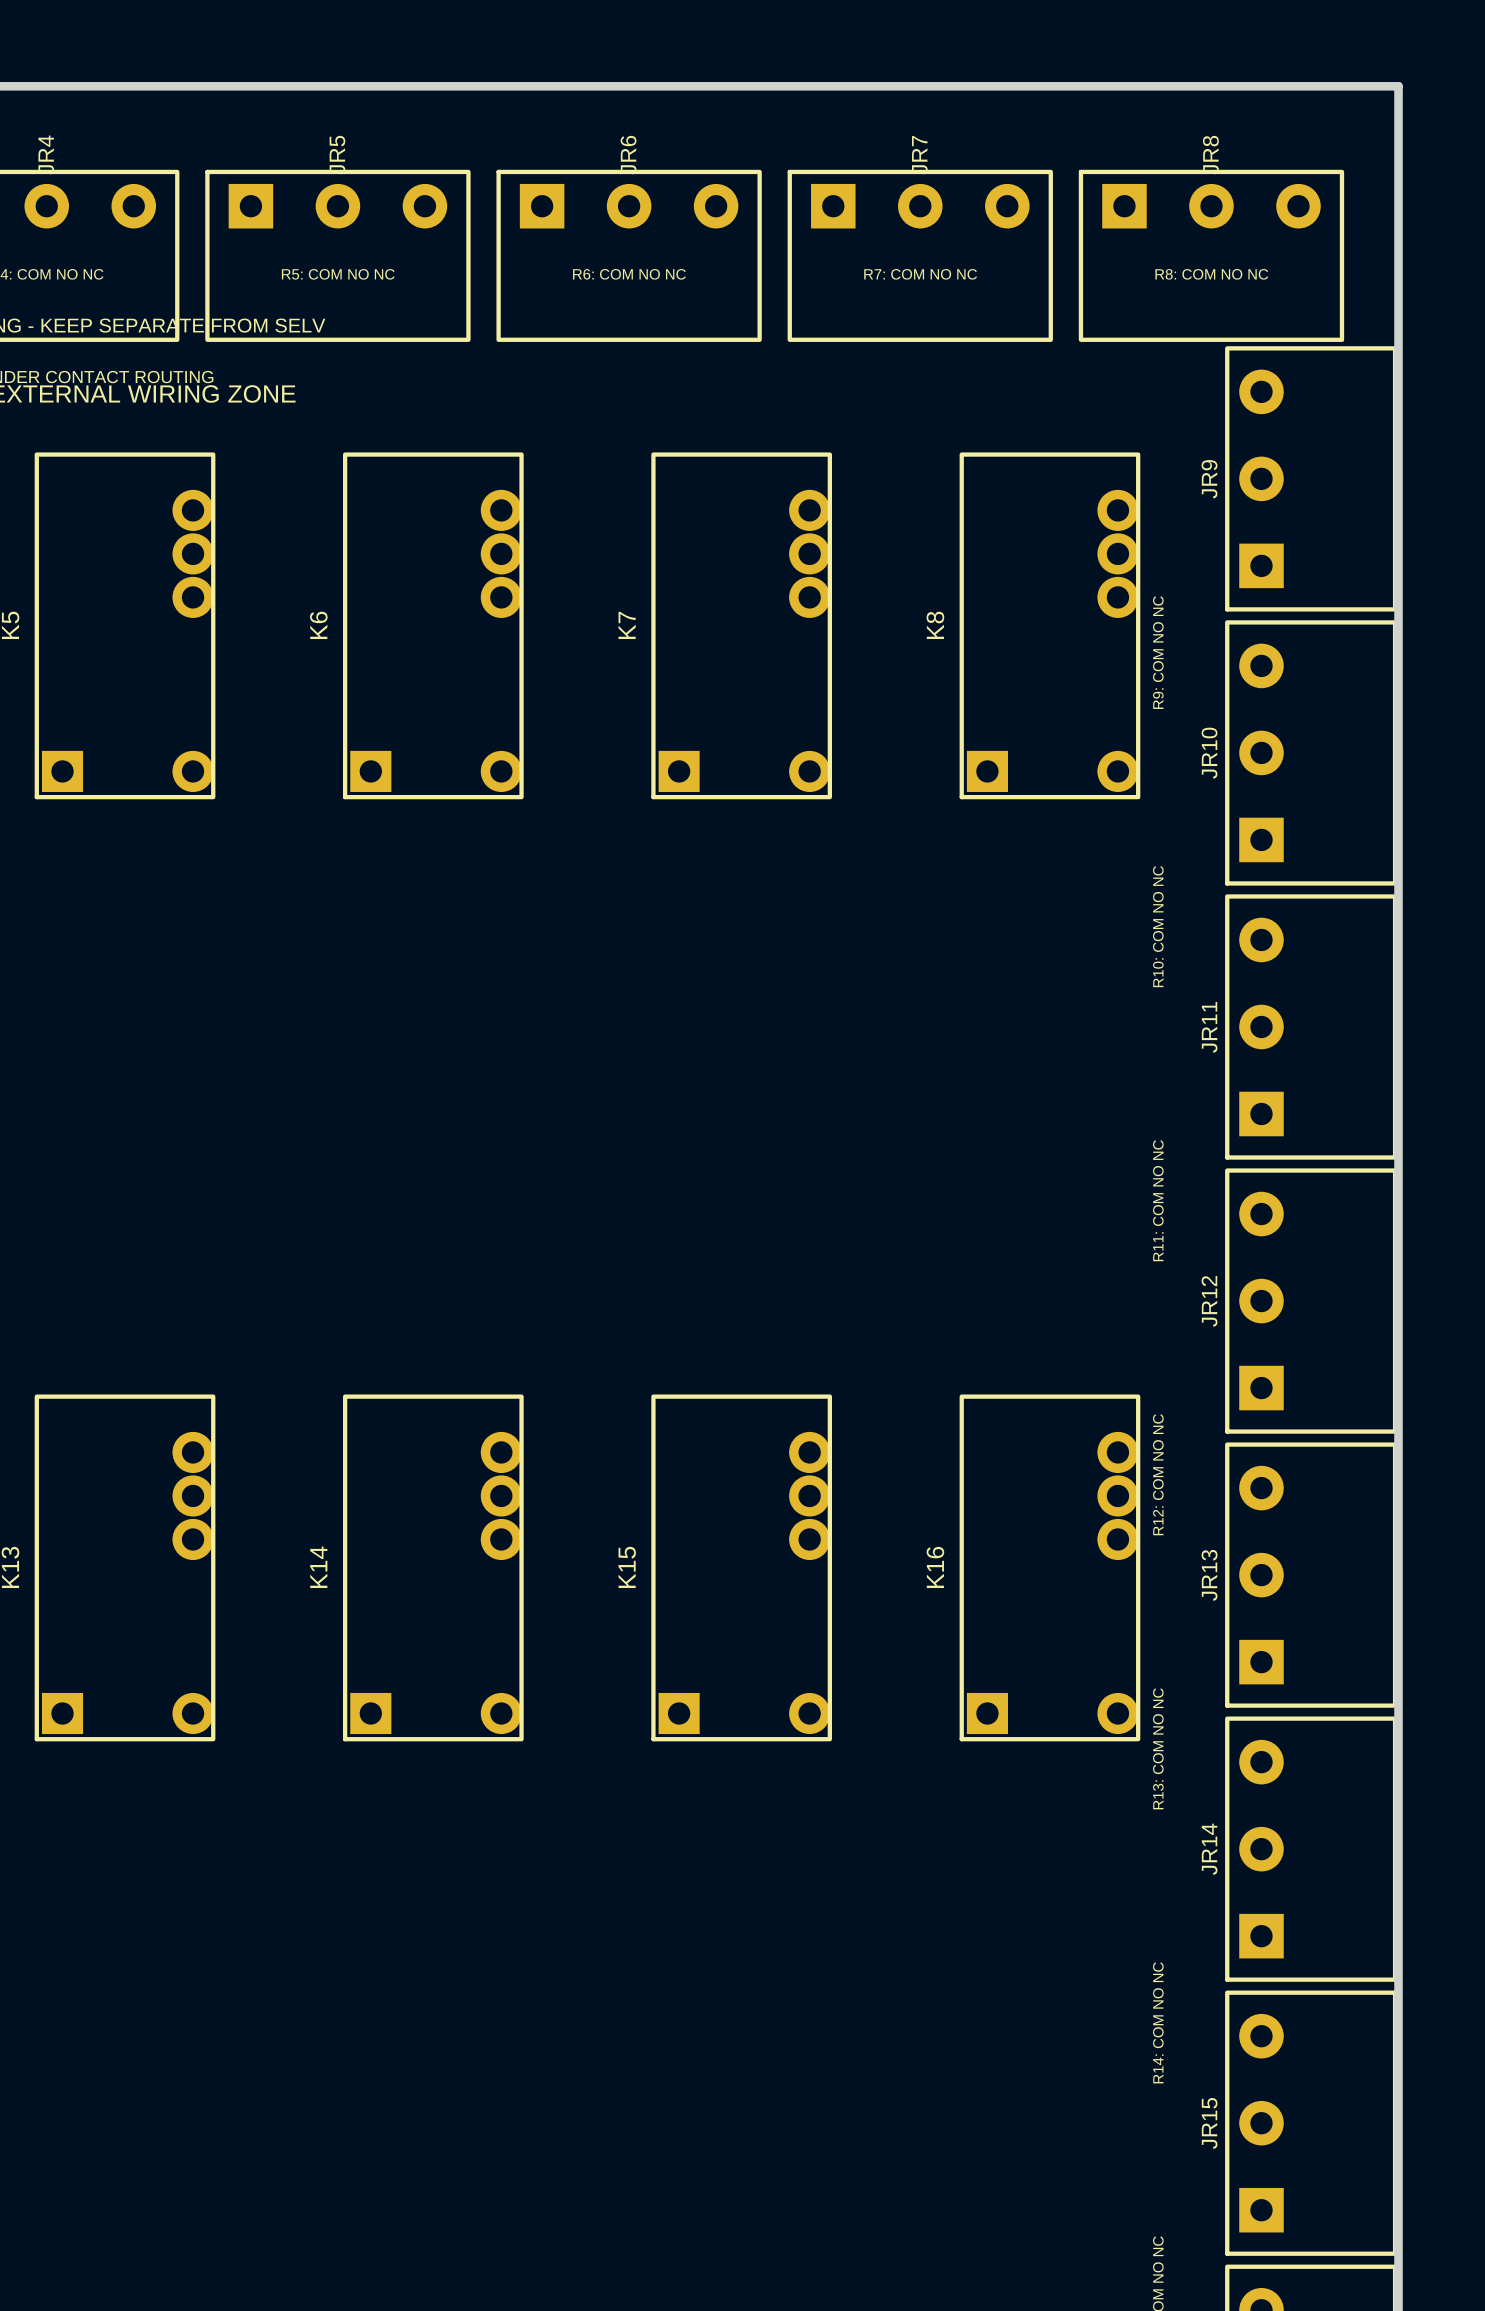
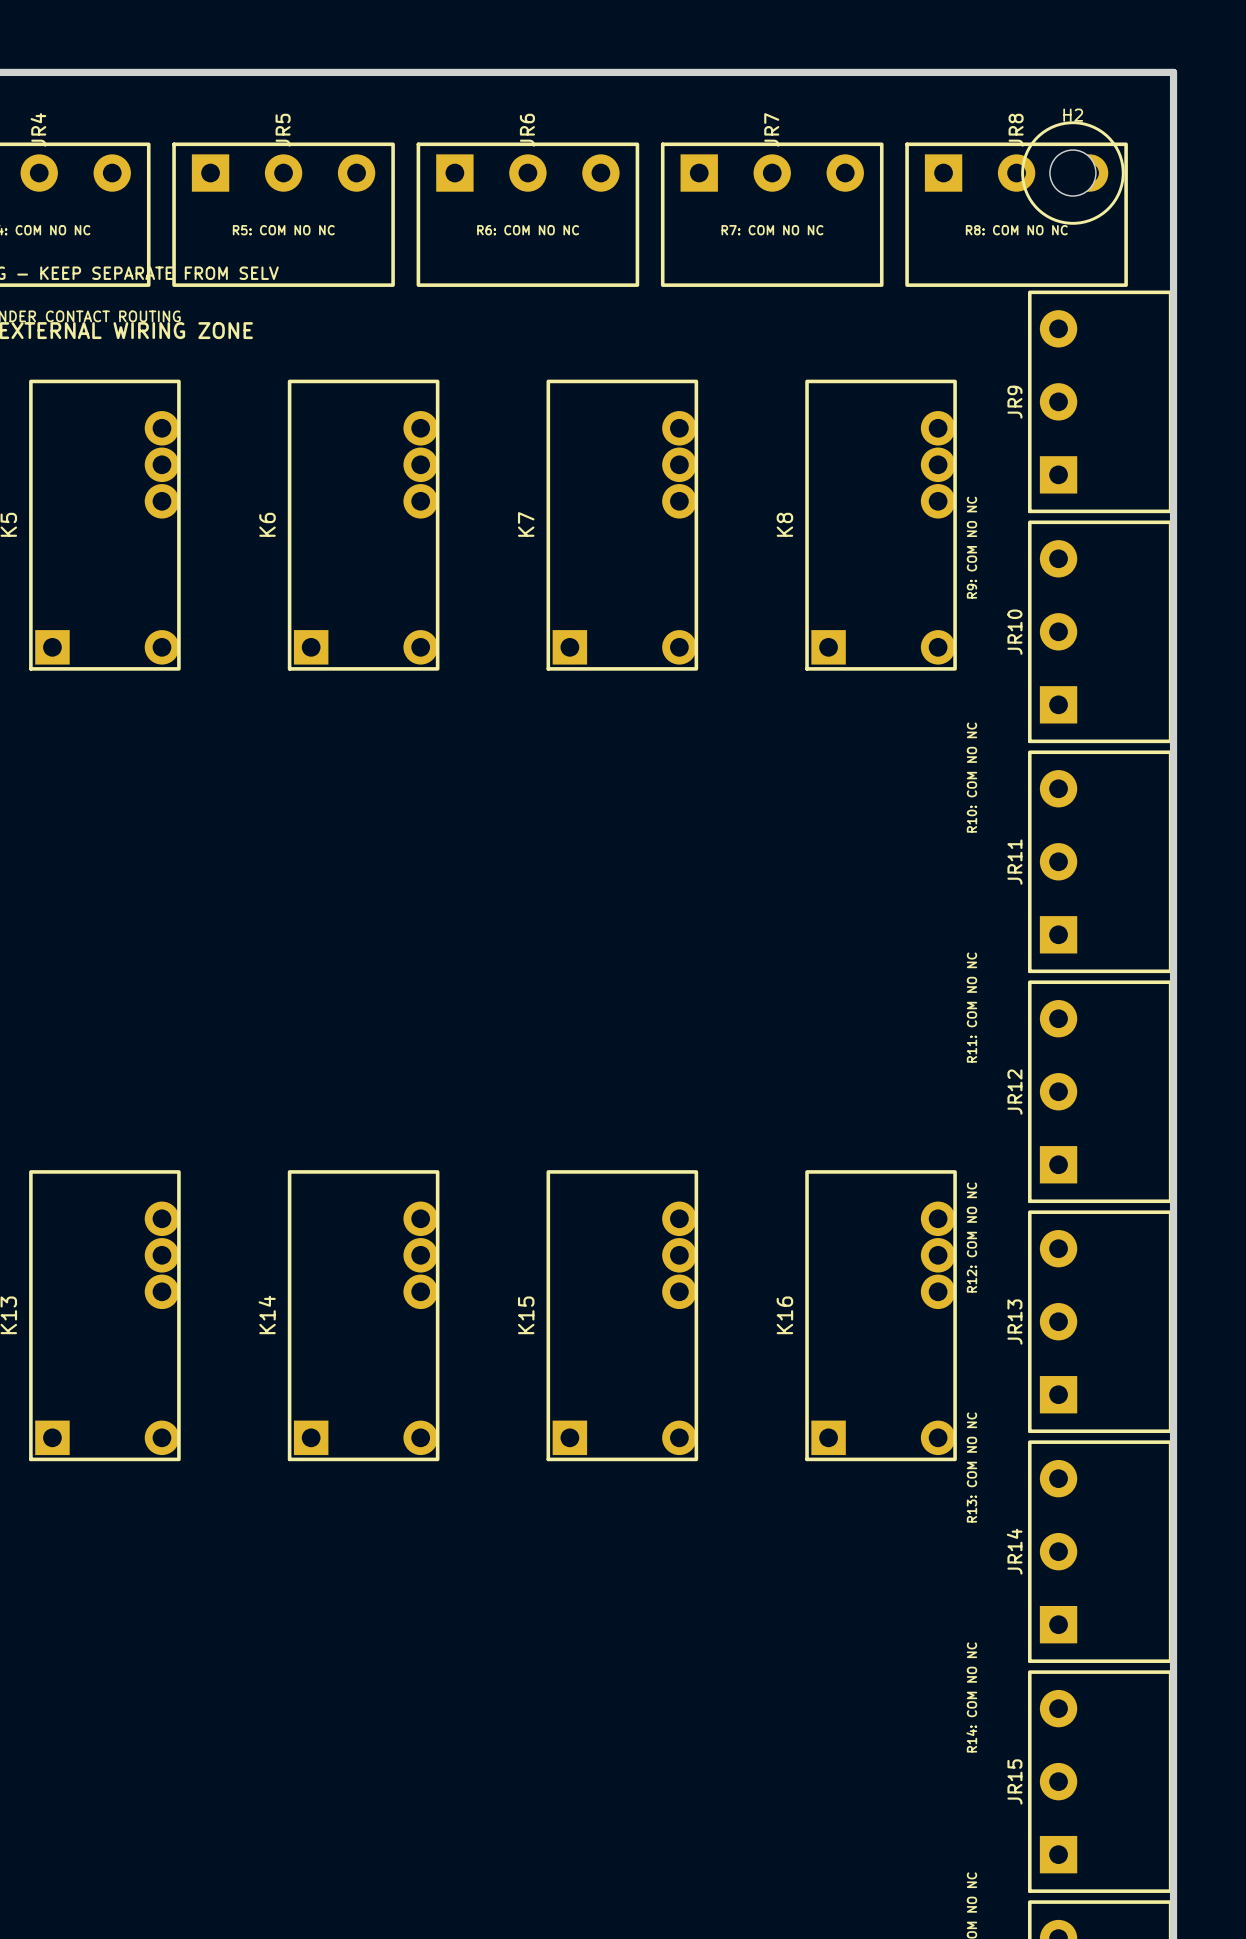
H2: none -> (1072, 173)

